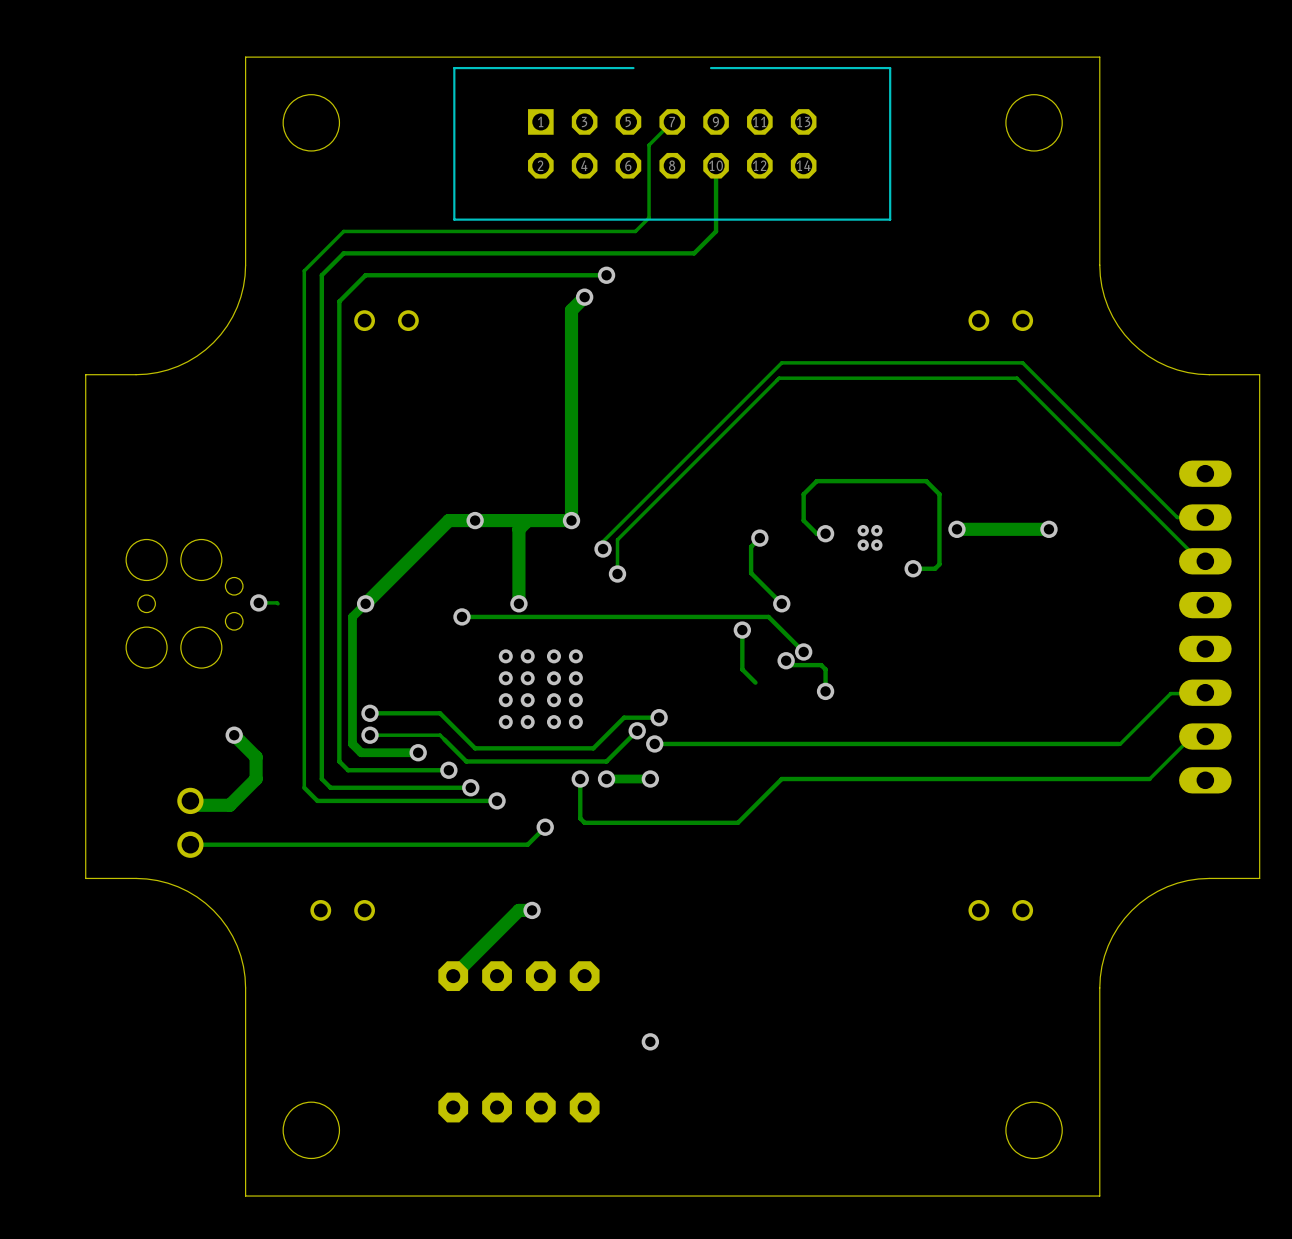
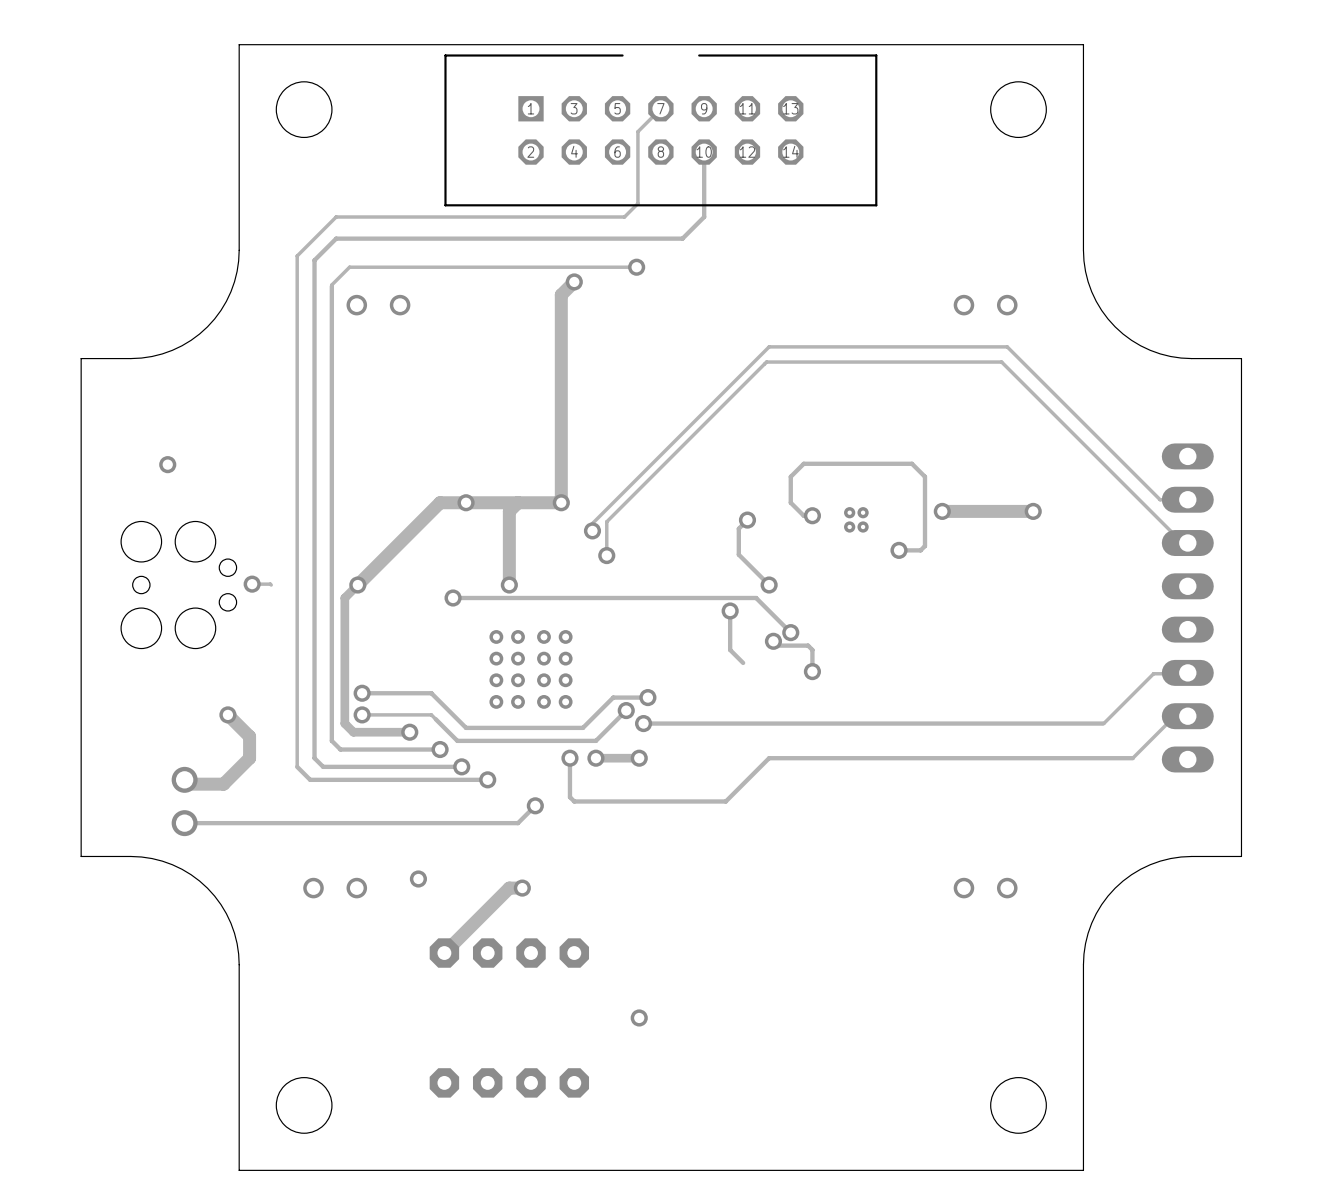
track: (606, 275) (365, 275) (339, 301) -> (636, 267) (349, 267) (331, 286)
via position: (606, 275) -> (636, 267)
via: none -> (167, 464)
via: none -> (418, 878)

